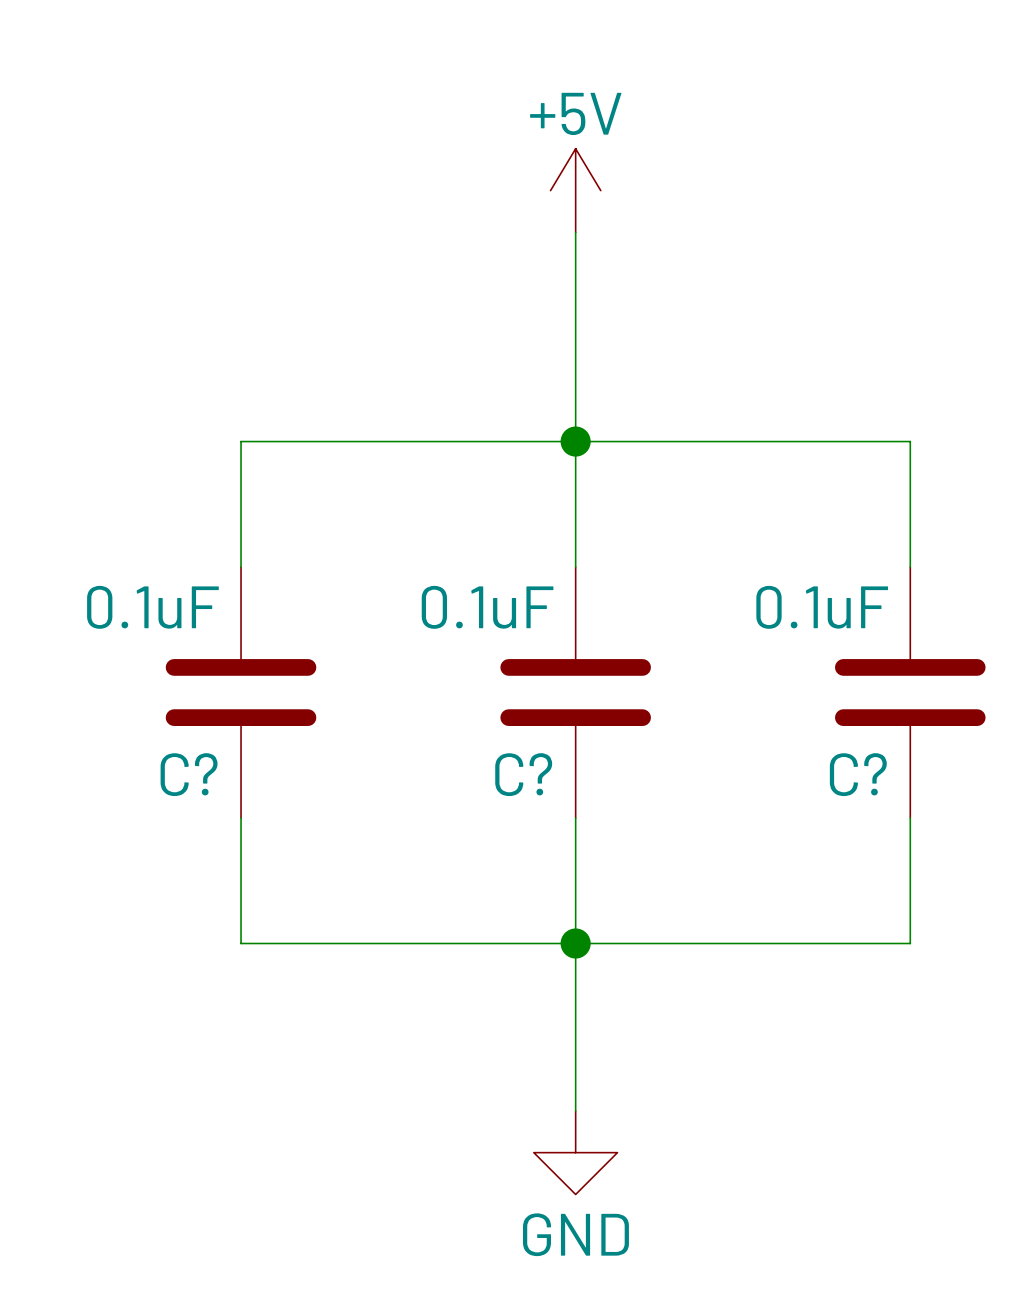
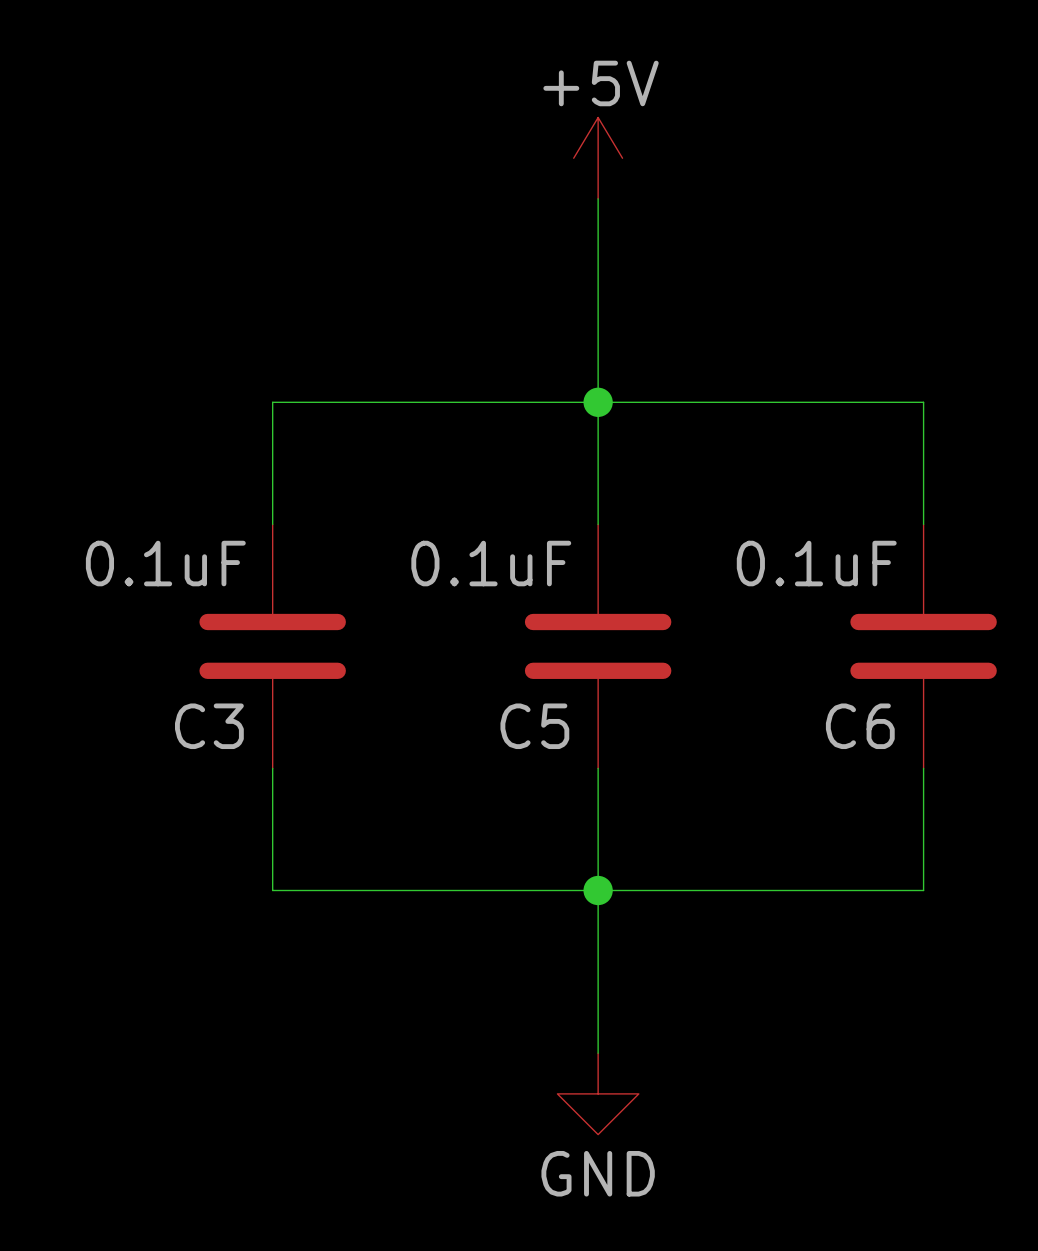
C? name: C? (189, 774) -> C3 (209, 726)
C? name: C? (523, 774) -> C5 (534, 726)
C? name: C? (858, 774) -> C6 (860, 726)

